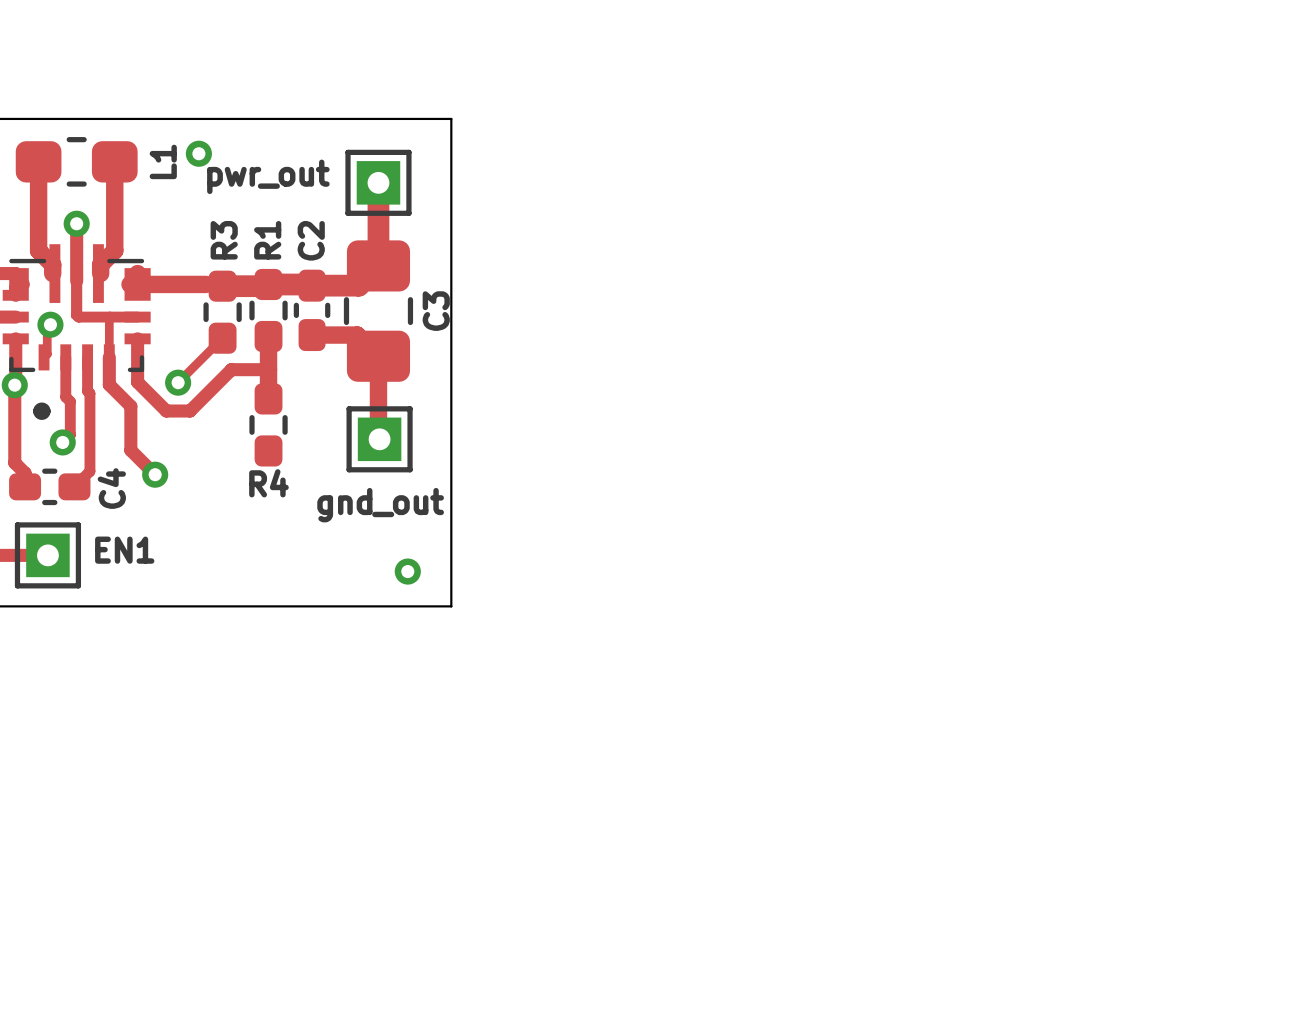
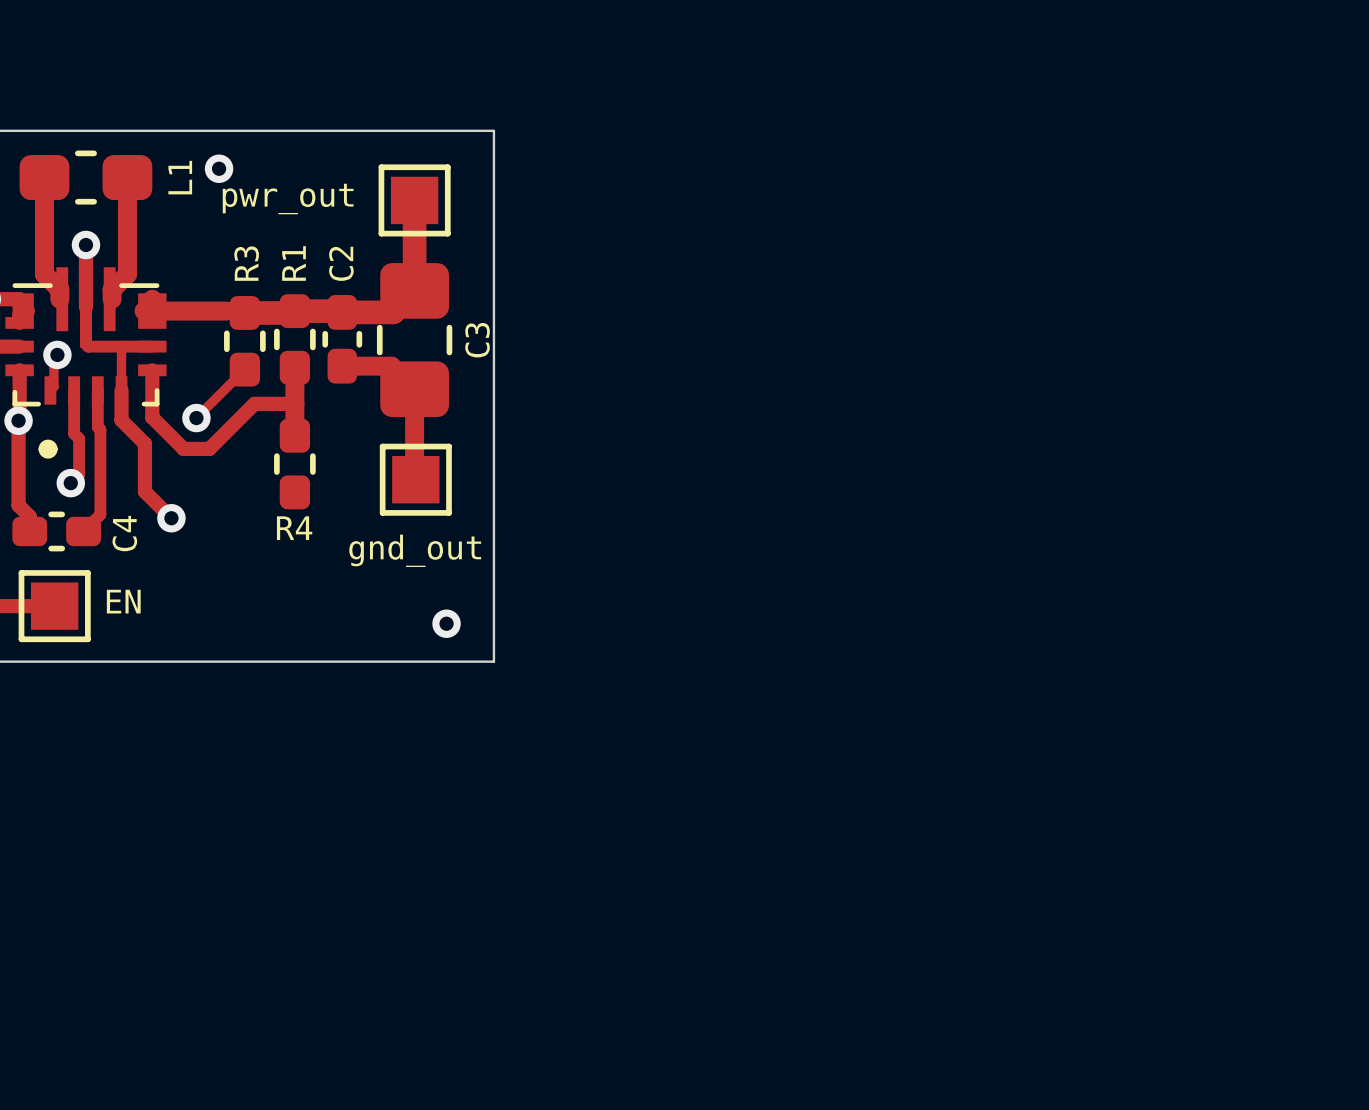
pwr_out footprint: [345, 149, 412, 216] -> [378, 164, 451, 237]
gnd_out footprint: [346, 406, 413, 473] -> [379, 443, 452, 516]
EN1: (47, 555) -> none
EN: none -> (54, 606)

